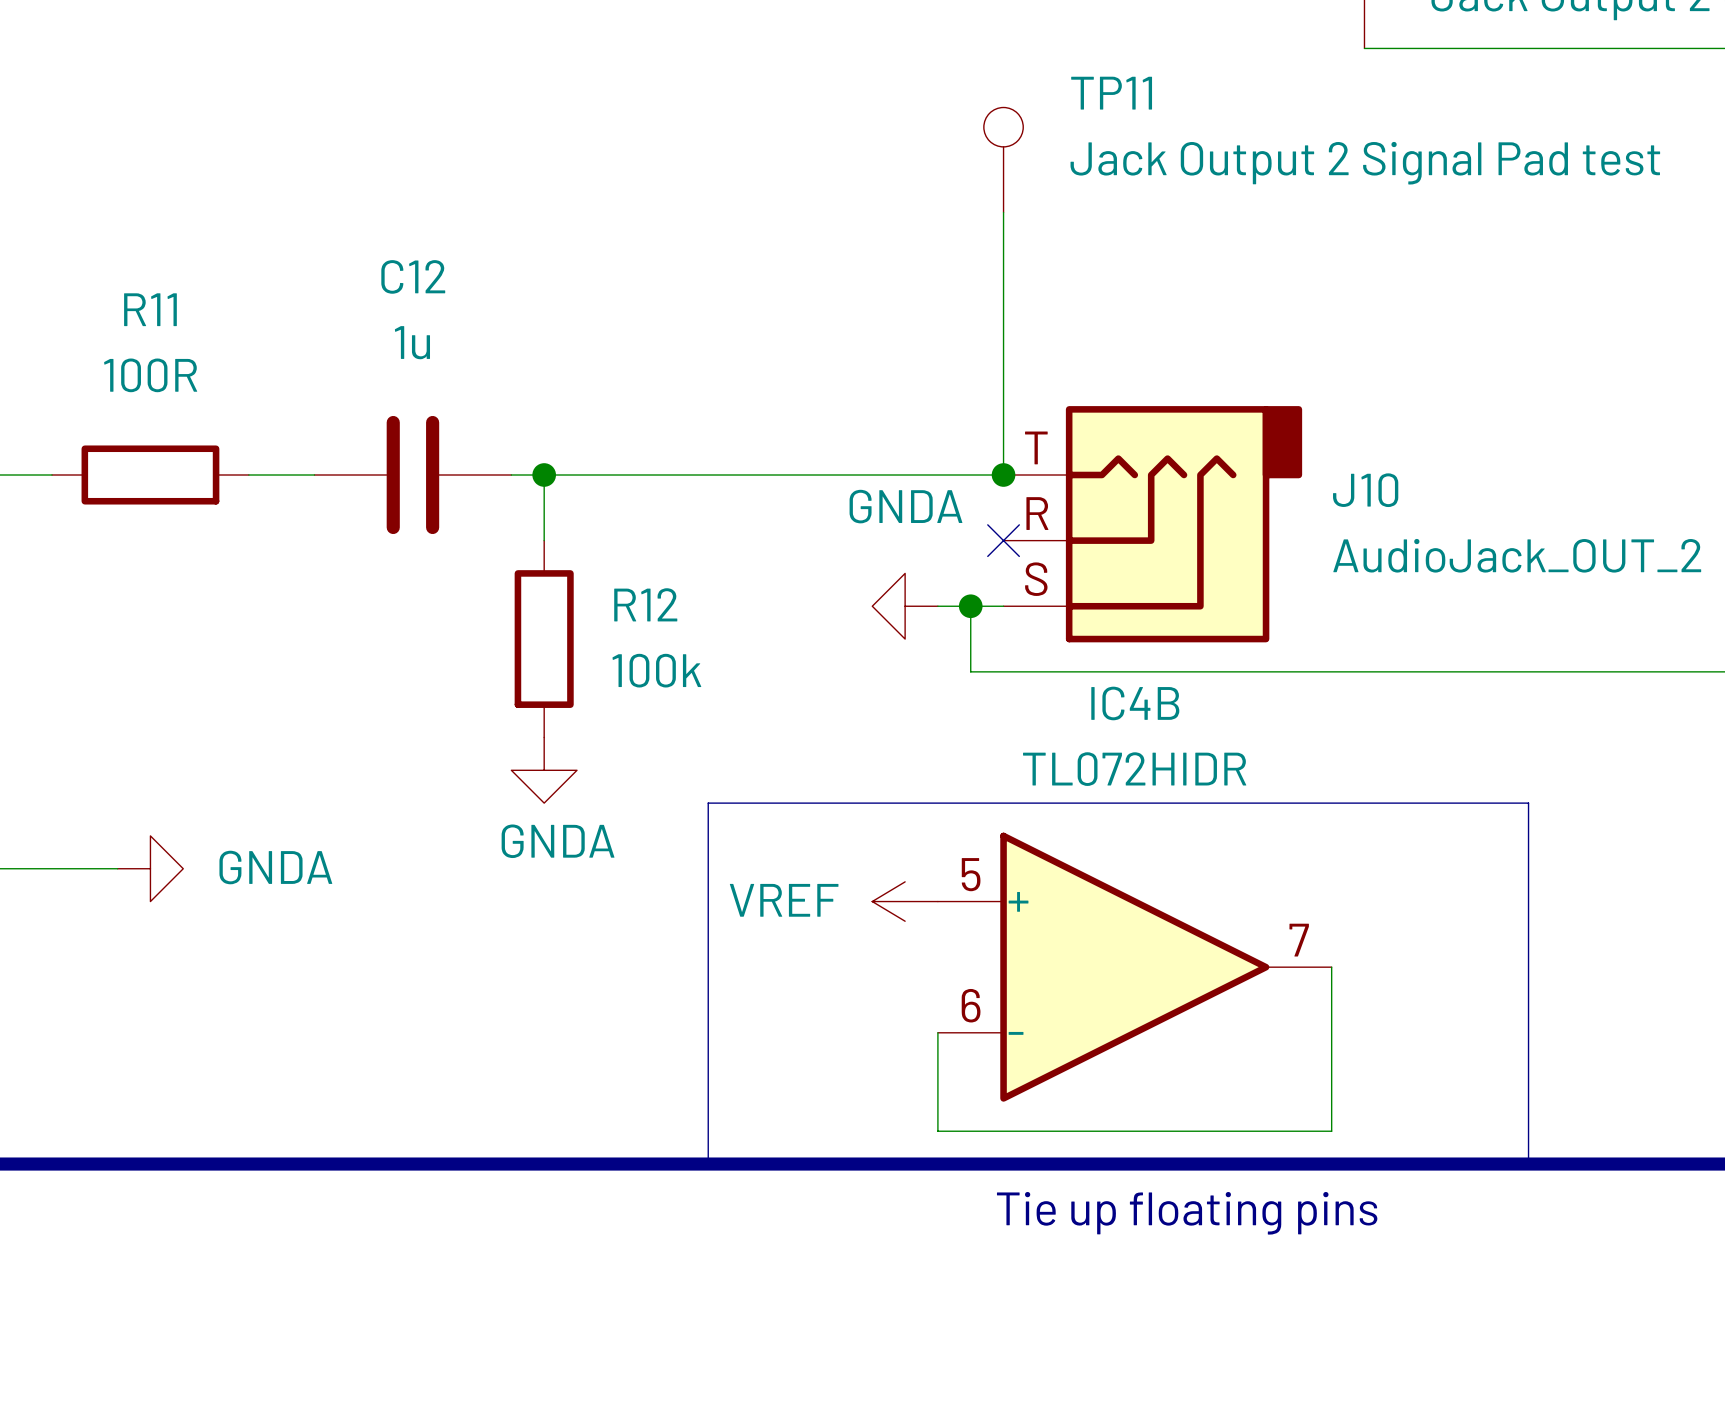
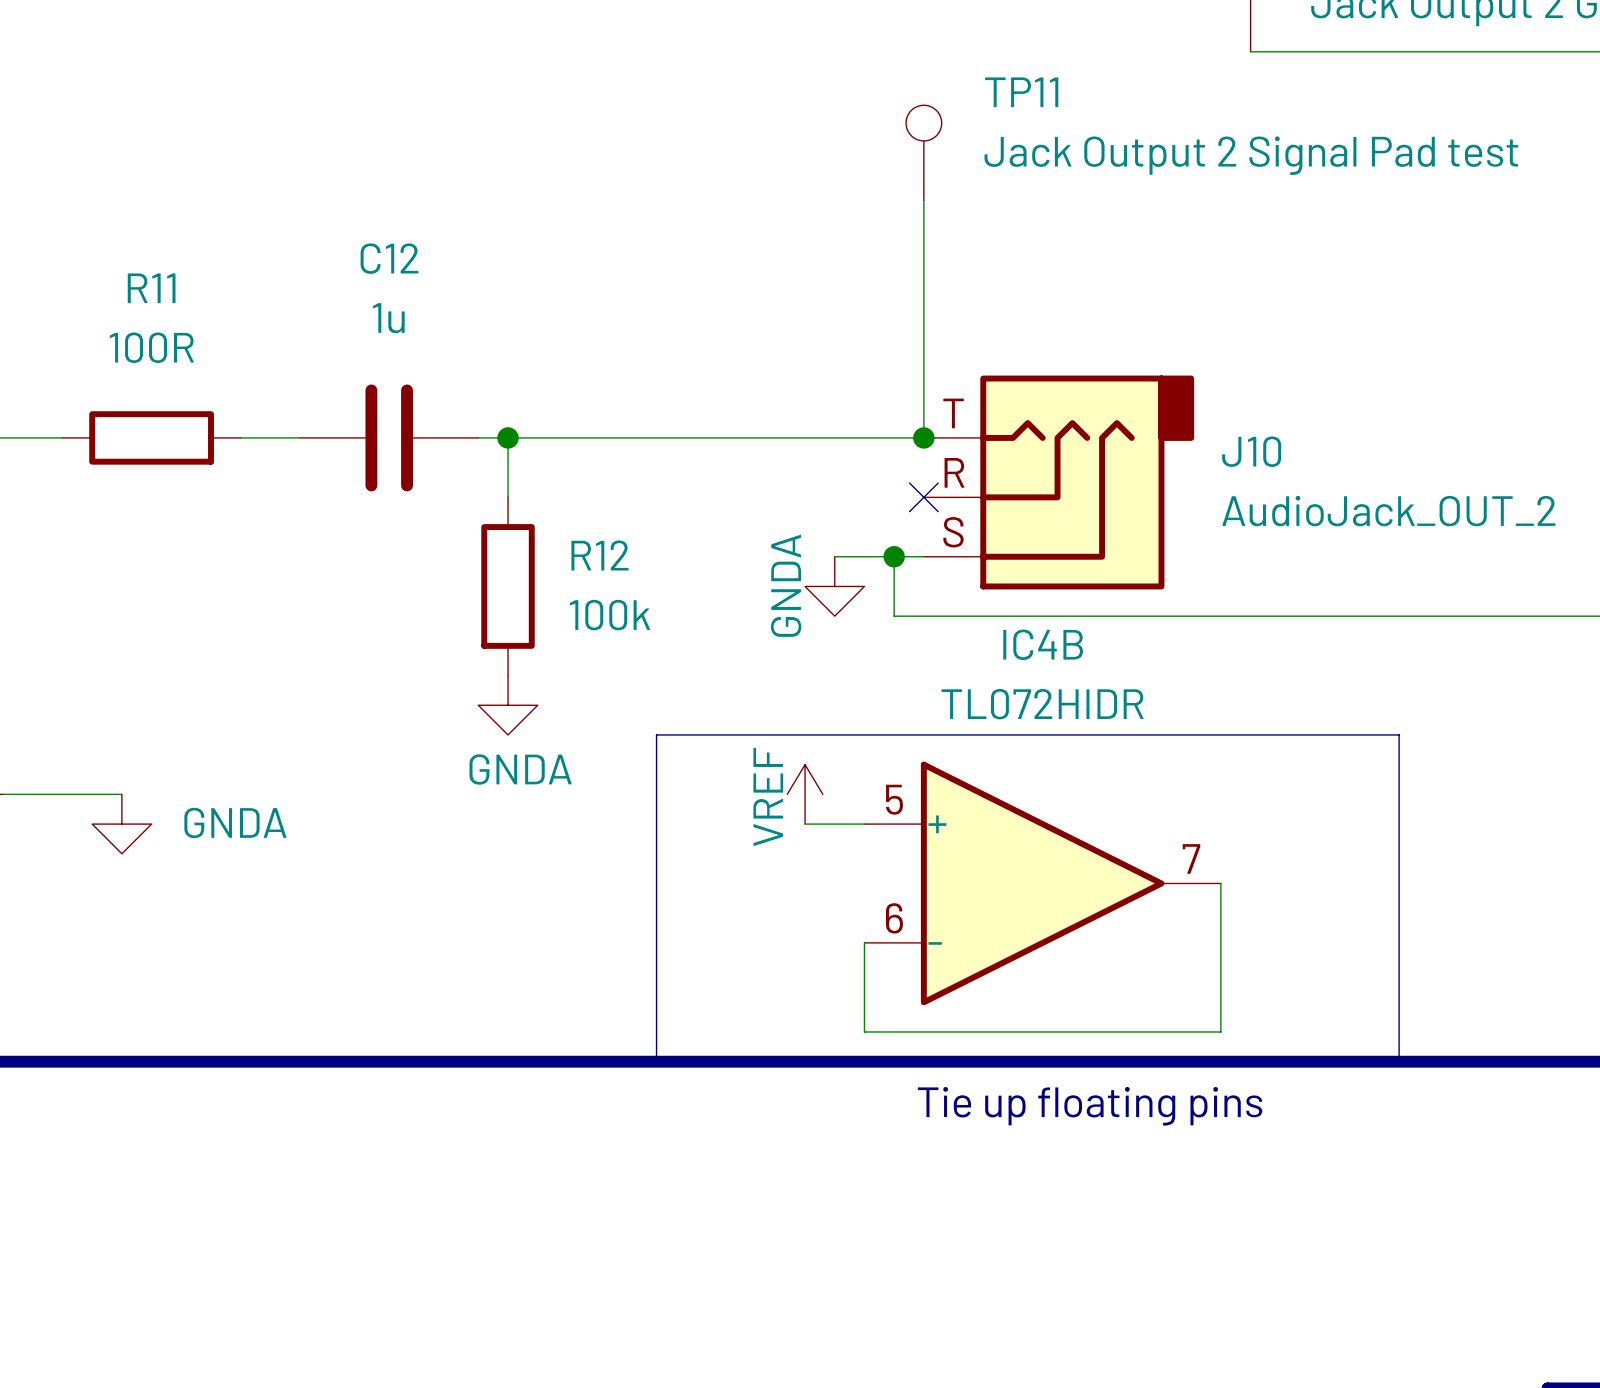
power symbol rotation: 0° (905, 606) -> 90° counterclockwise (834, 586)
power symbol rotation: 0° (150, 868) -> 90° clockwise (121, 824)
power symbol position: GNDA (150, 868) -> GNDA (121, 824)
power symbol text position: VREF (784, 900) -> VREF (768, 796)
power symbol rotation: 0° (905, 901) -> 90° clockwise (805, 794)
power symbol position: VREF (905, 901) -> VREF (805, 794)

